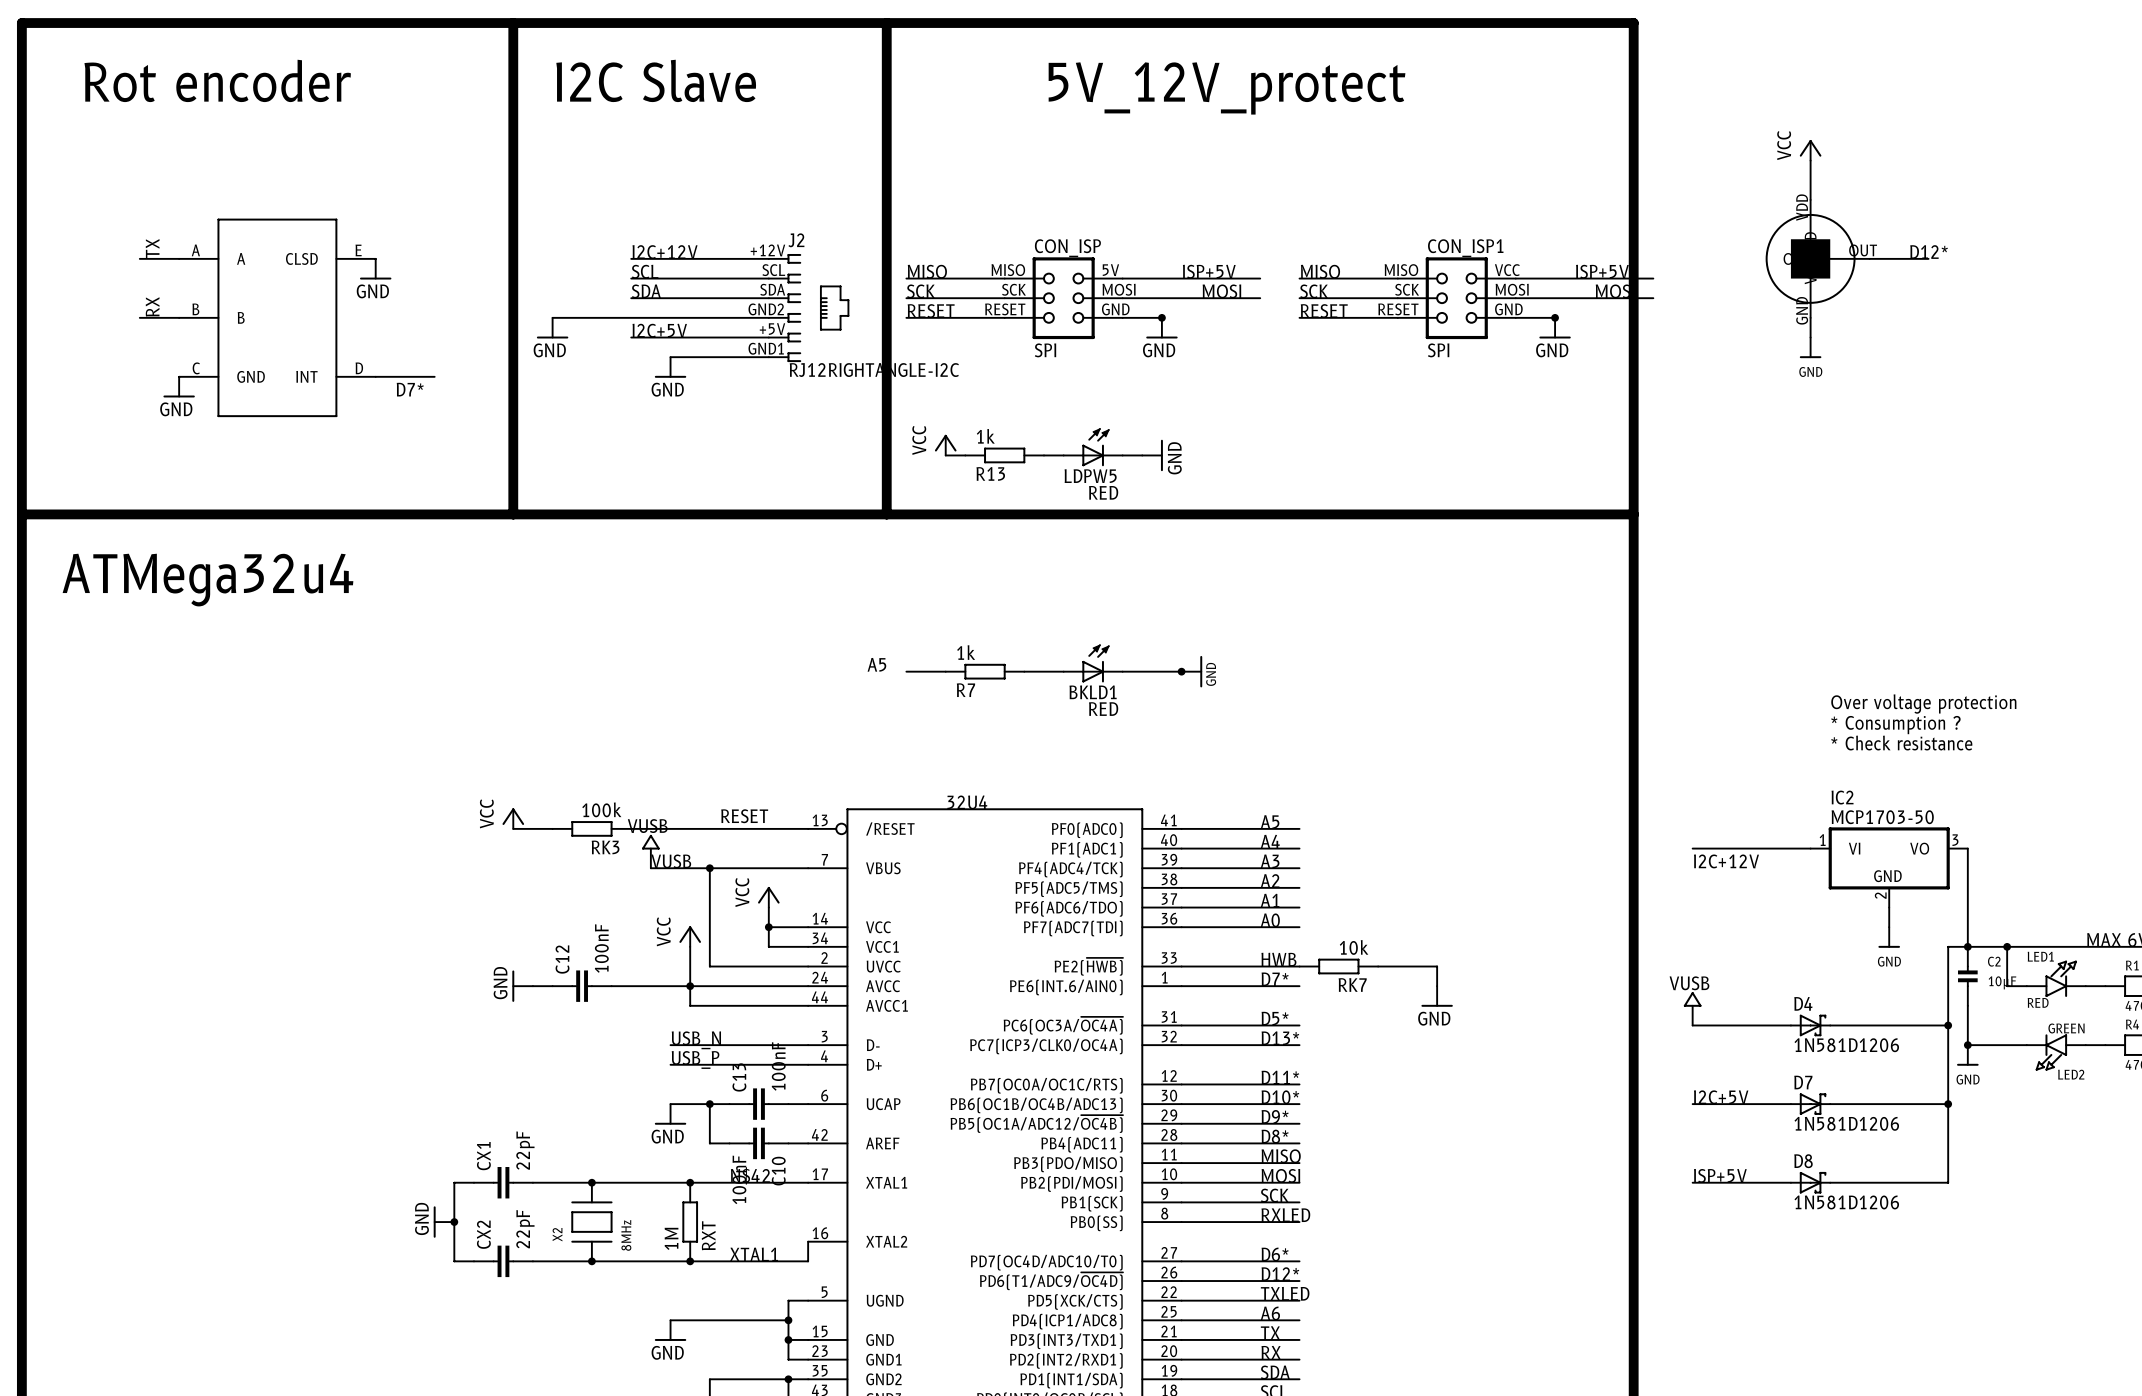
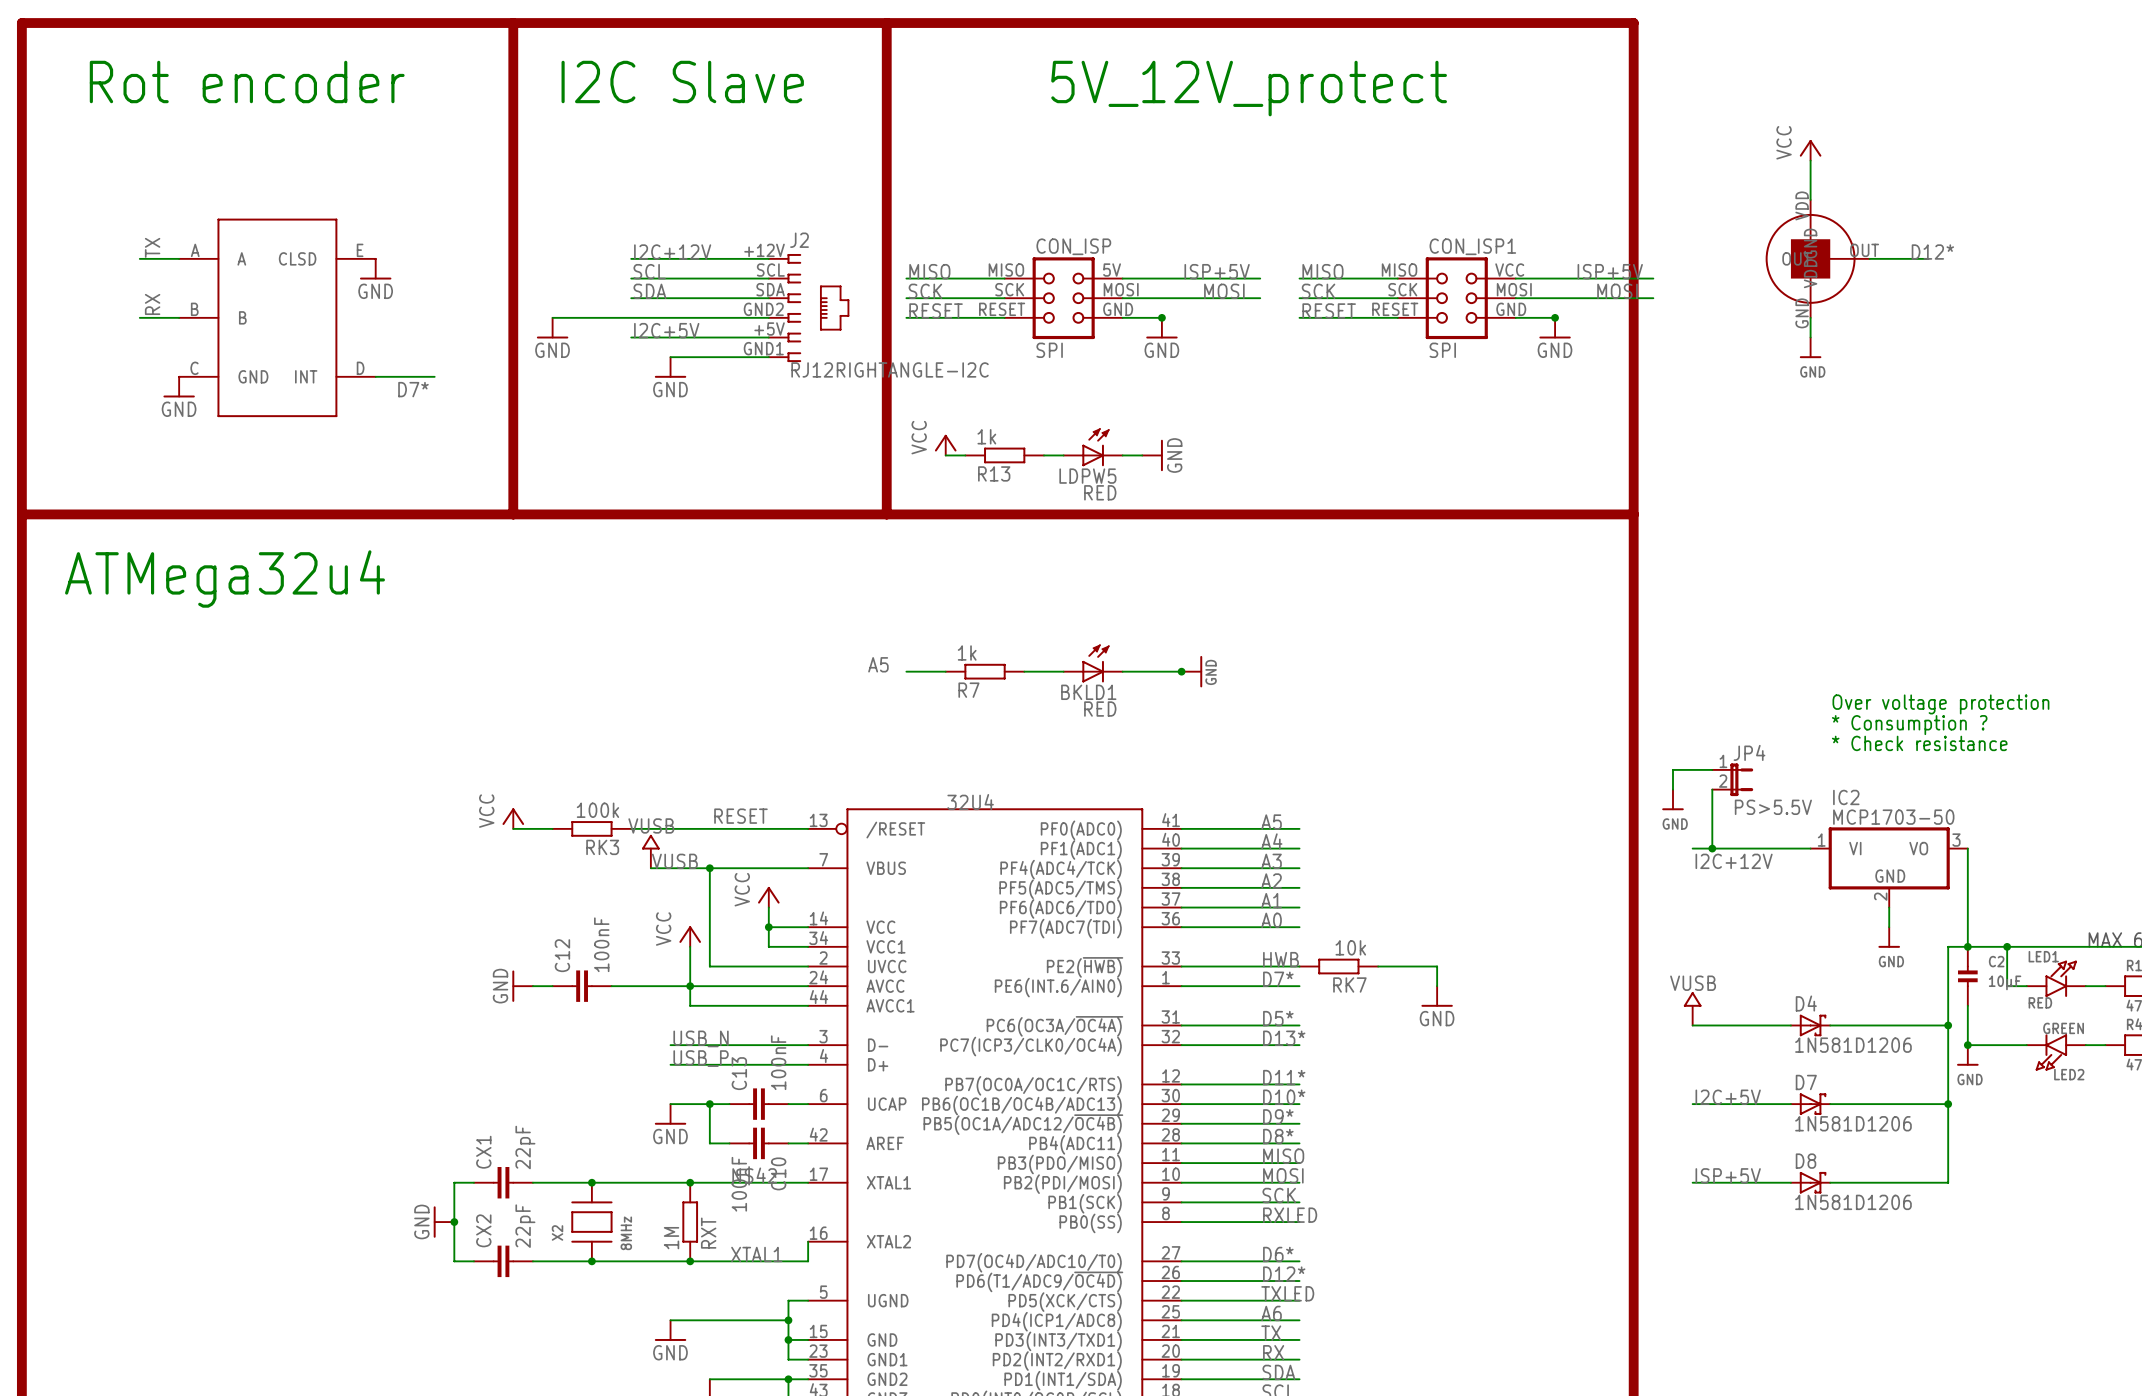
wire: none -> (1712, 769) (1672, 769) (1672, 789)
JP4: none -> PS>5.5V (1732, 779)
wire: none -> (1712, 789) (1712, 848)
power symbol: none -> GND (1672, 799)
junction: none -> (1712, 848)

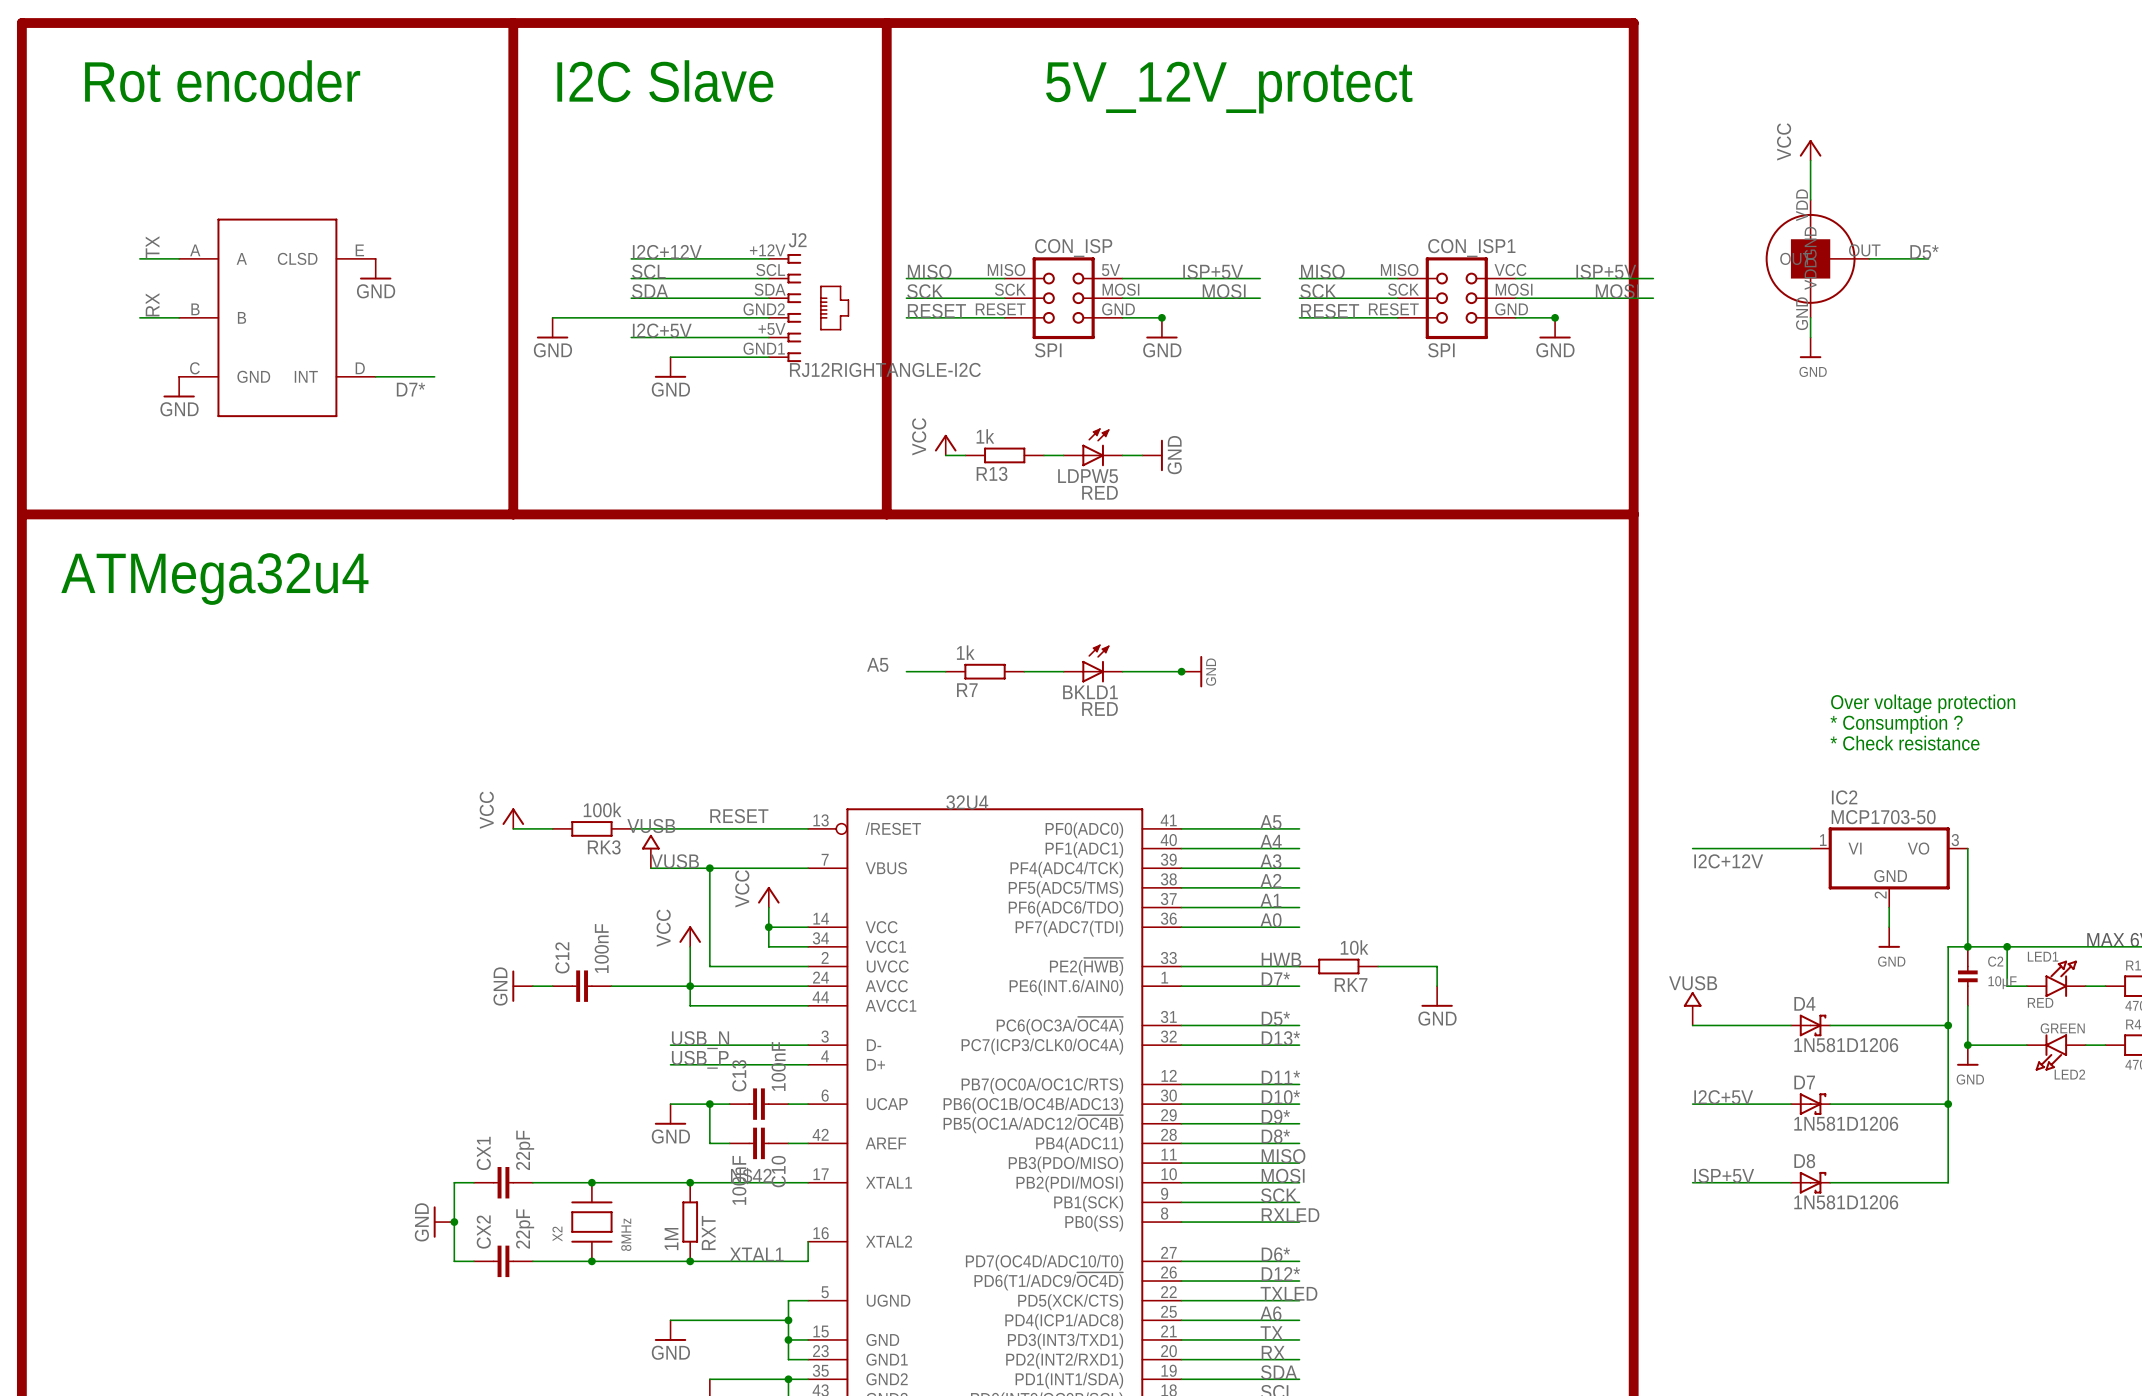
label: D12* (1932, 252) -> D5* (1924, 252)
wire: (1712, 769) (1672, 769) (1672, 789) -> none
JP4: PS>5.5V (1732, 779) -> none
wire: (1712, 789) (1712, 848) -> none
power symbol: GND (1672, 799) -> none
junction: (1712, 848) -> none

